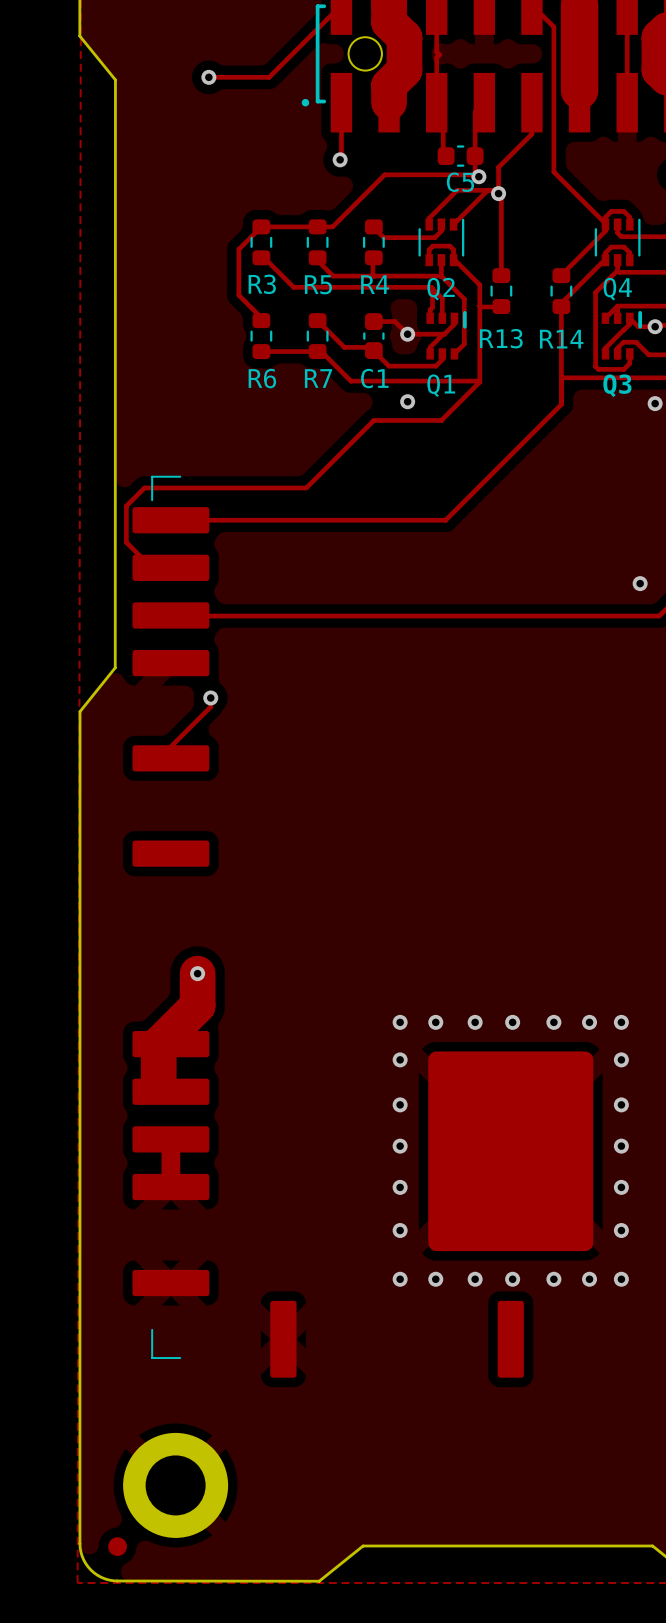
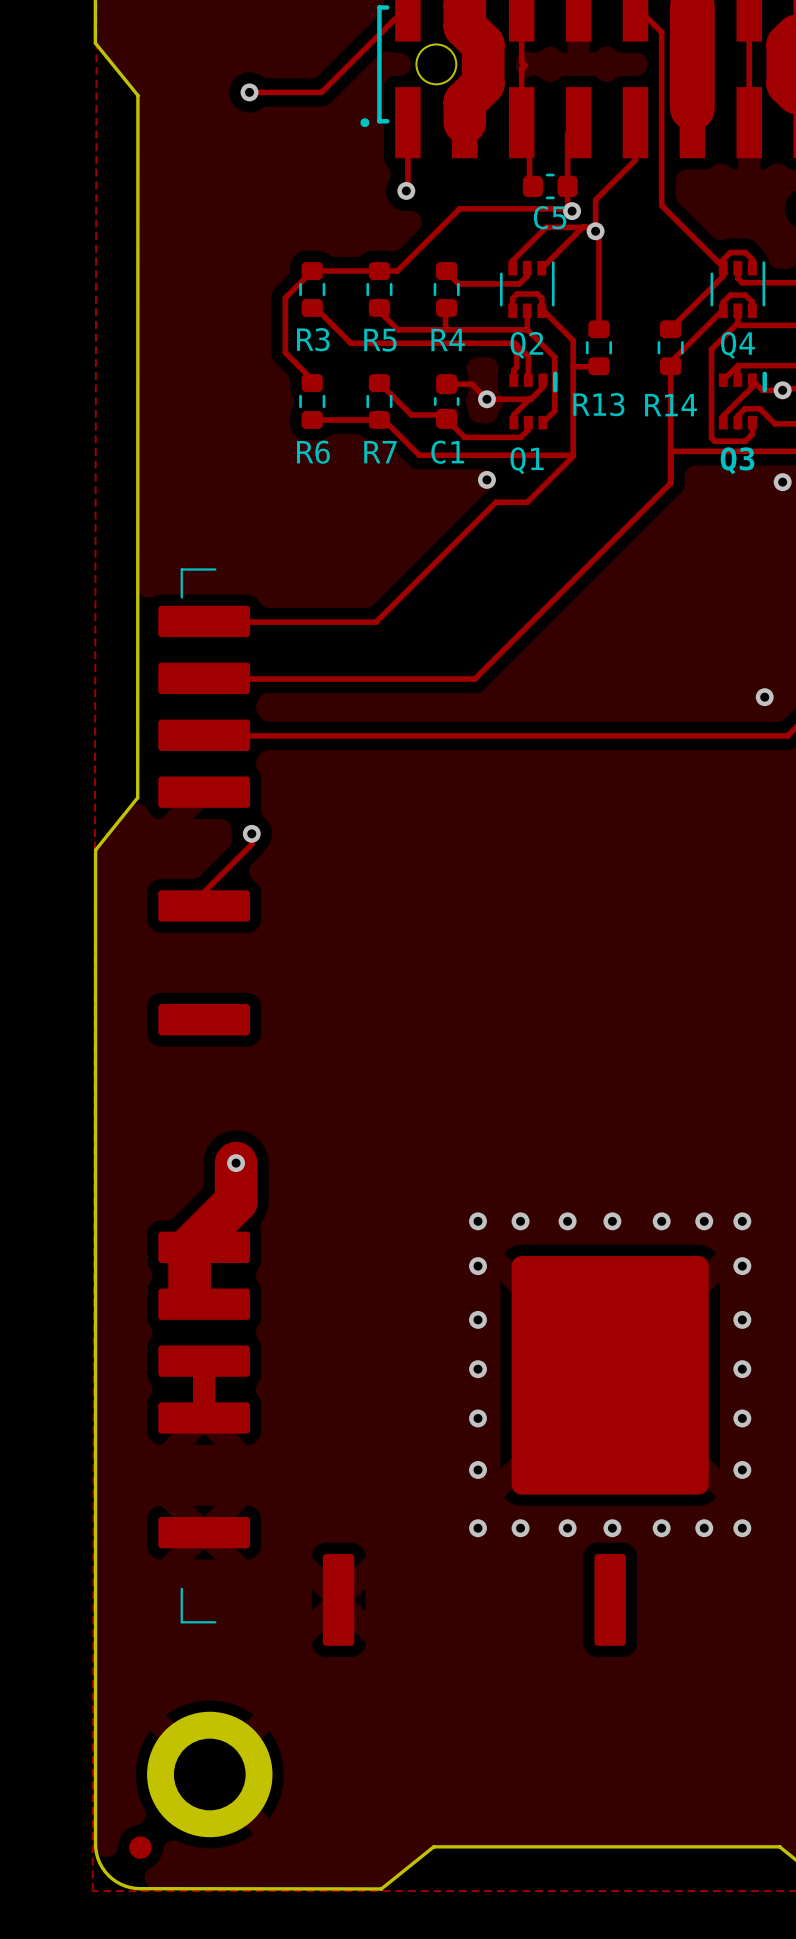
track: (415, 420) (373, 420) (306, 487) (144, 487) (126, 506) (126, 542) (151, 567) (170, 567) -> (495, 502) (376, 622) (189, 622)
track: (170, 520) (445, 520) -> (189, 679) (474, 679) (532, 621)

